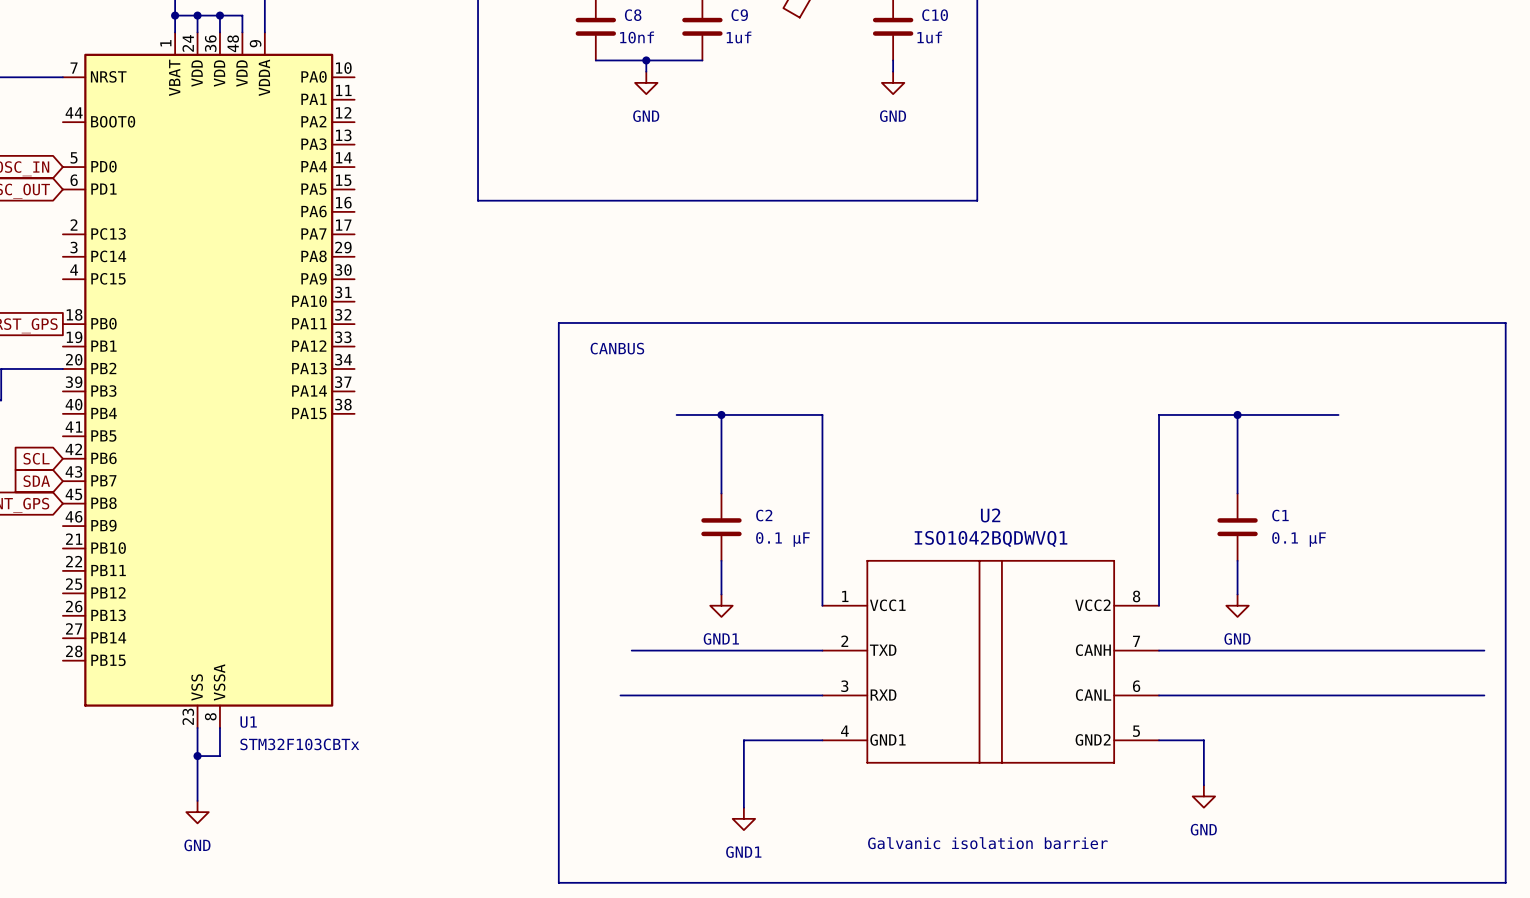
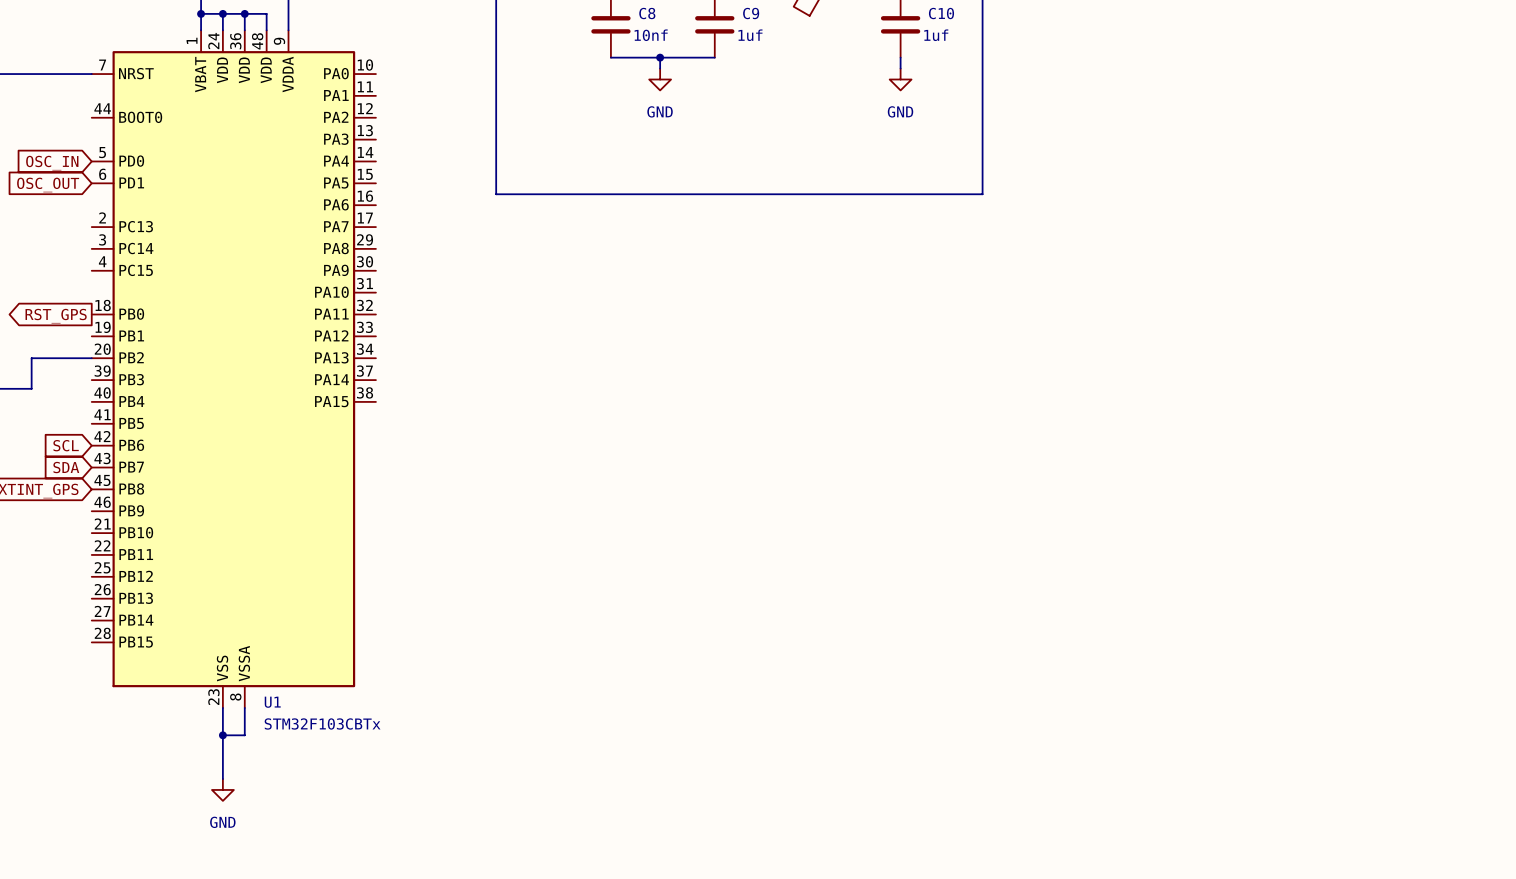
line: (558, 322) (1505, 322) (1505, 882) (558, 882) (558, 322) -> none
text: CANBUS (617, 348) -> none
wire: (676, 414) (822, 414) (822, 605) -> none
wire: (721, 414) (721, 493) -> none
junction: (721, 414) -> none
wire: (1237, 414) (1237, 493) -> none
junction: (1237, 414) -> none
wire: (1338, 414) (1159, 414) (1159, 605) -> none
C2: 0.1 µF (721, 527) -> none
C1: 0.1 µF (1237, 527) -> none
wire: (721, 560) (721, 594) -> none
wire: (1237, 560) (1237, 594) -> none
power symbol: GND1 (721, 605) -> none
power symbol: GND (1237, 605) -> none
wire: (631, 650) (822, 650) -> none
wire: (1159, 650) (1484, 650) -> none
U2: ISO1042BQDWVQ1 (990, 661) -> none
wire: (620, 695) (822, 695) -> none
wire: (1159, 695) (1484, 695) -> none
wire: (822, 740) (743, 740) (743, 807) -> none
wire: (1159, 740) (1203, 740) (1203, 785) -> none
power symbol: GND (1203, 796) -> none
power symbol: GND1 (743, 818) -> none
text: Galvanic isolation barrier (987, 843) -> none

